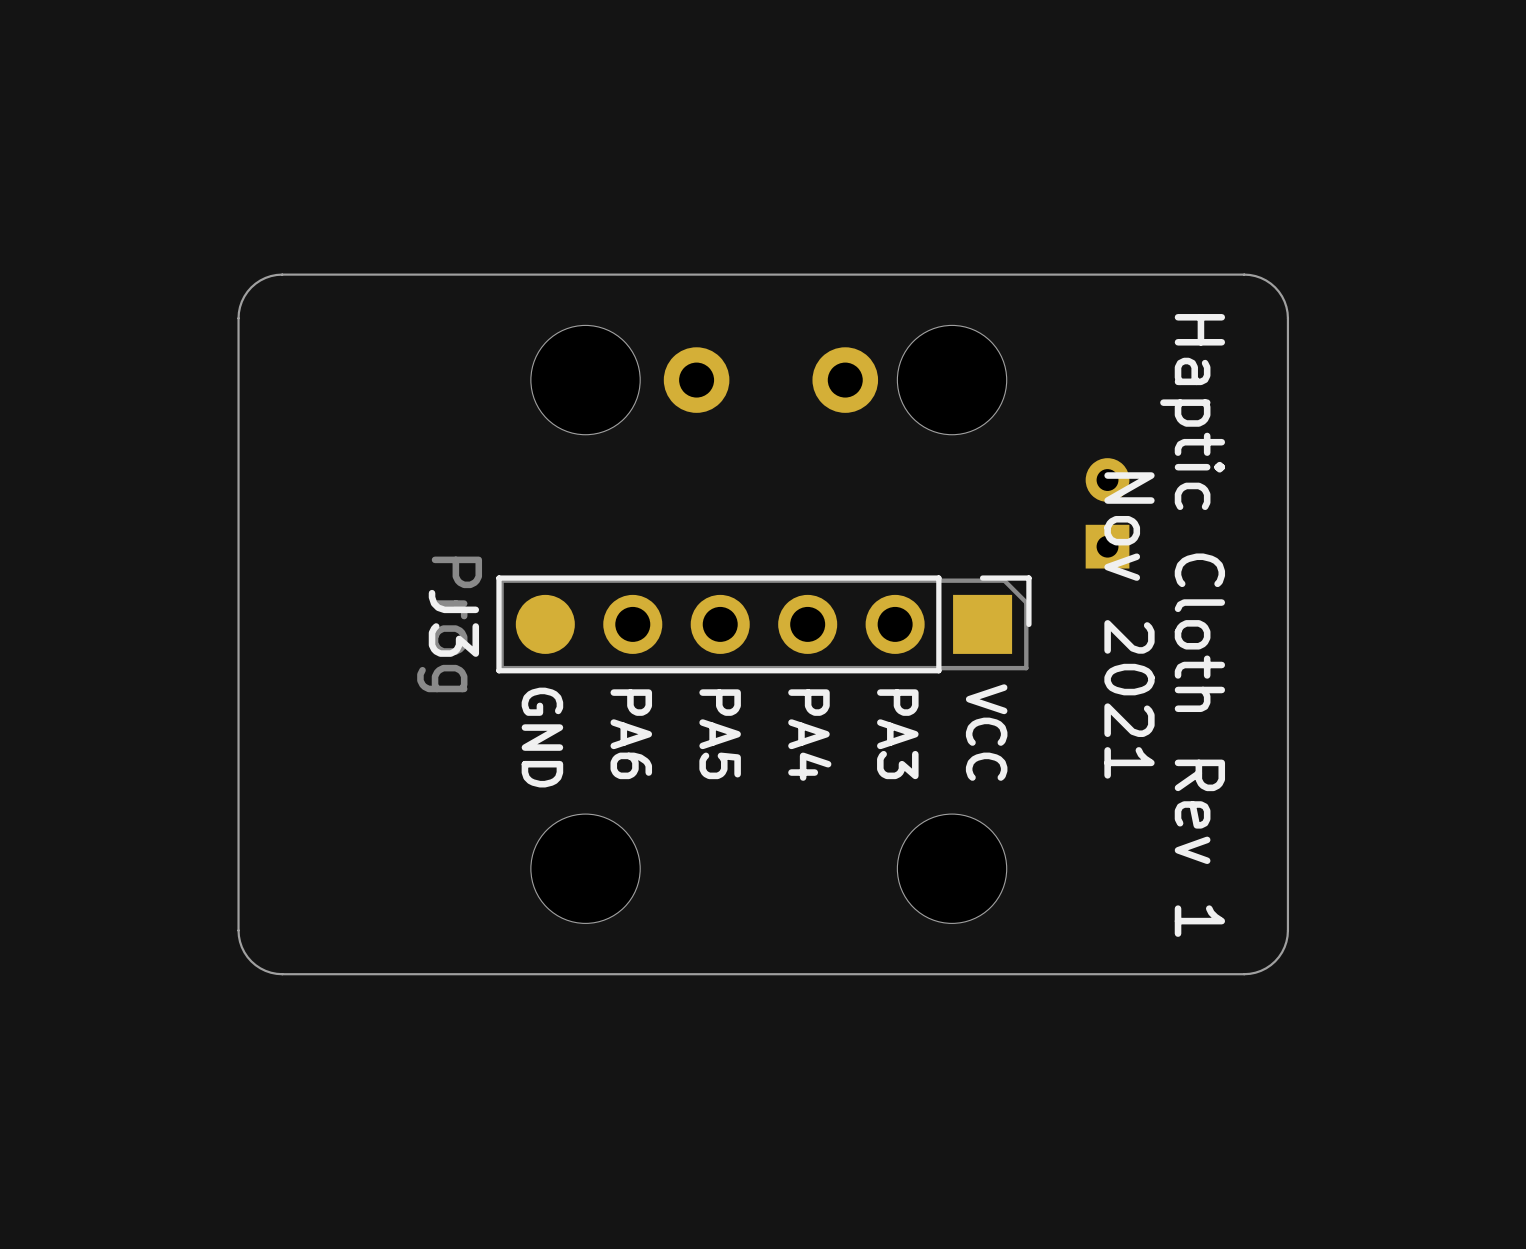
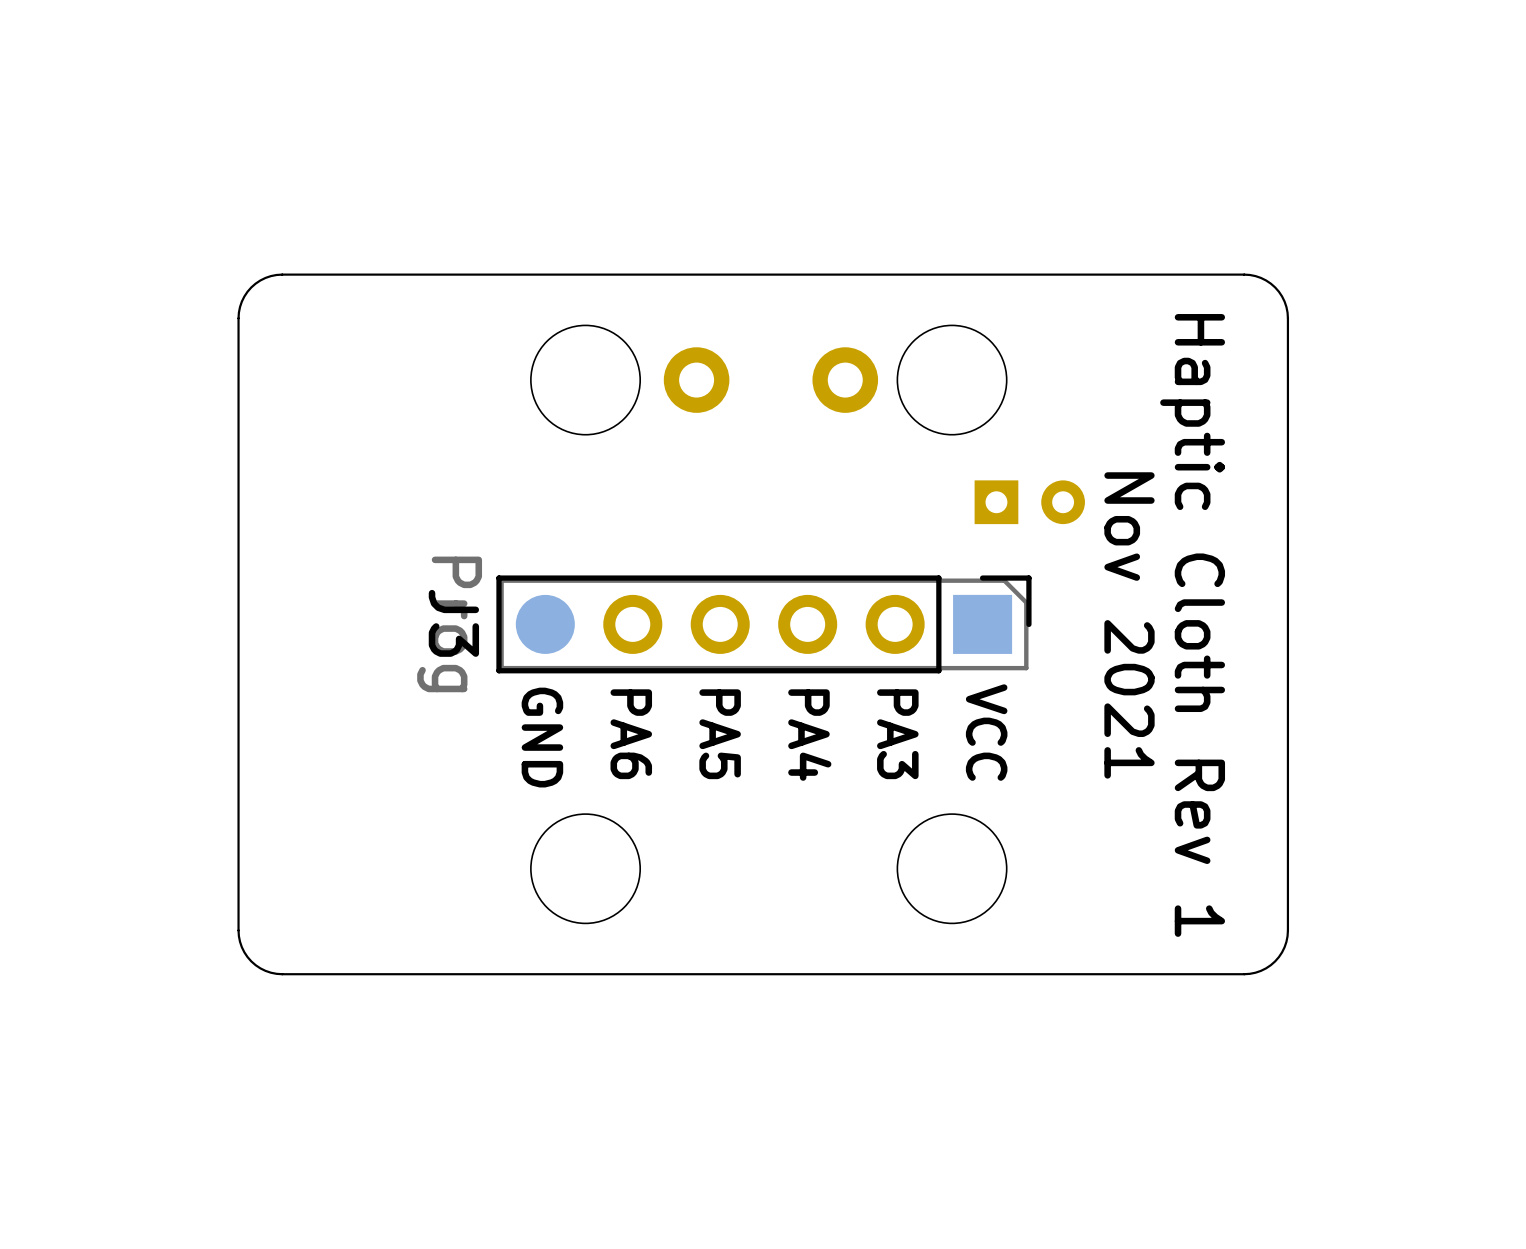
part rotation: 0° (1107, 513) -> 90° clockwise (1029, 502)
part position: (1107, 513) -> (1029, 502)

